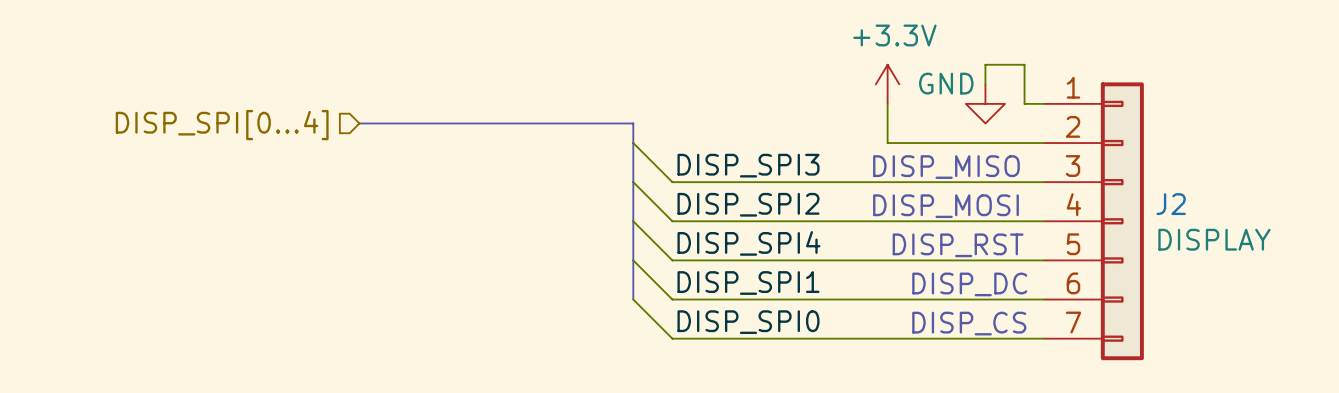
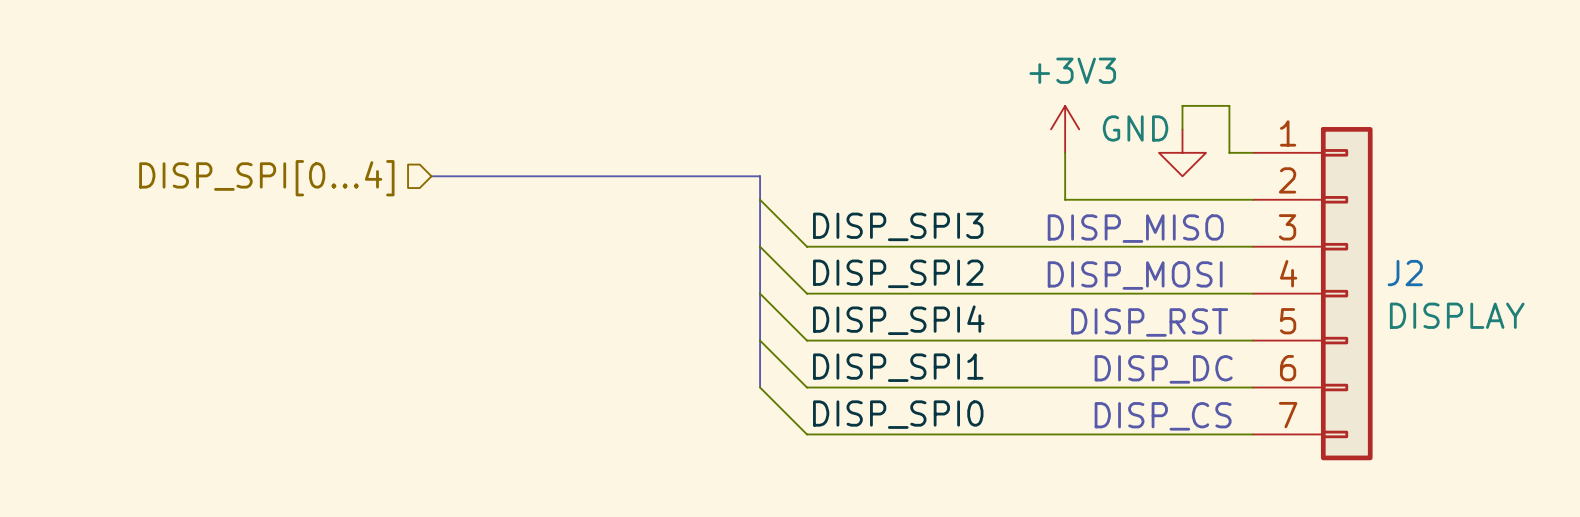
power symbol: +3.3V (887, 84) -> +3V3 (1065, 129)

